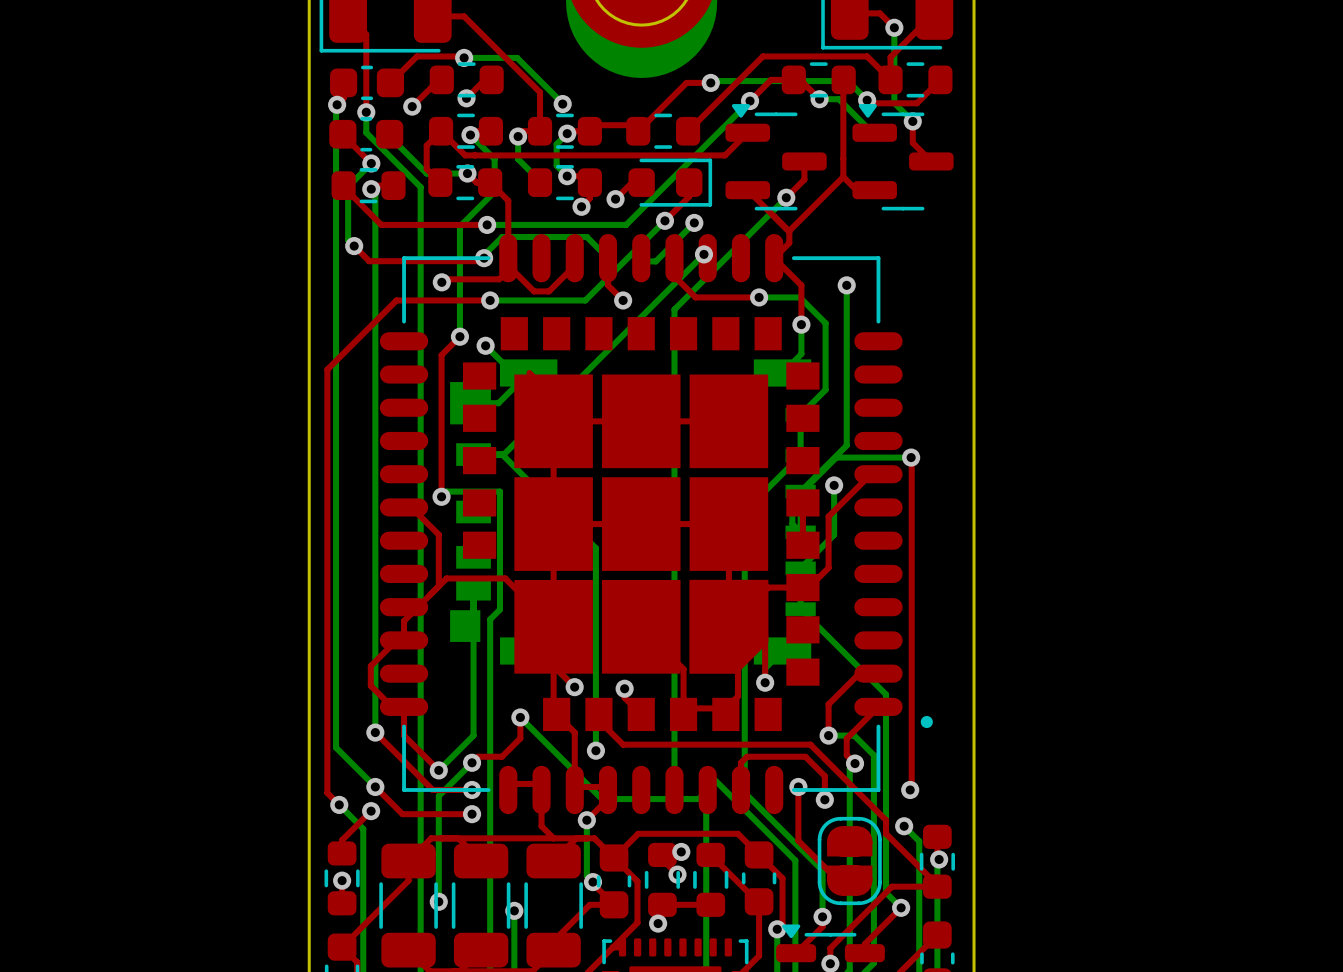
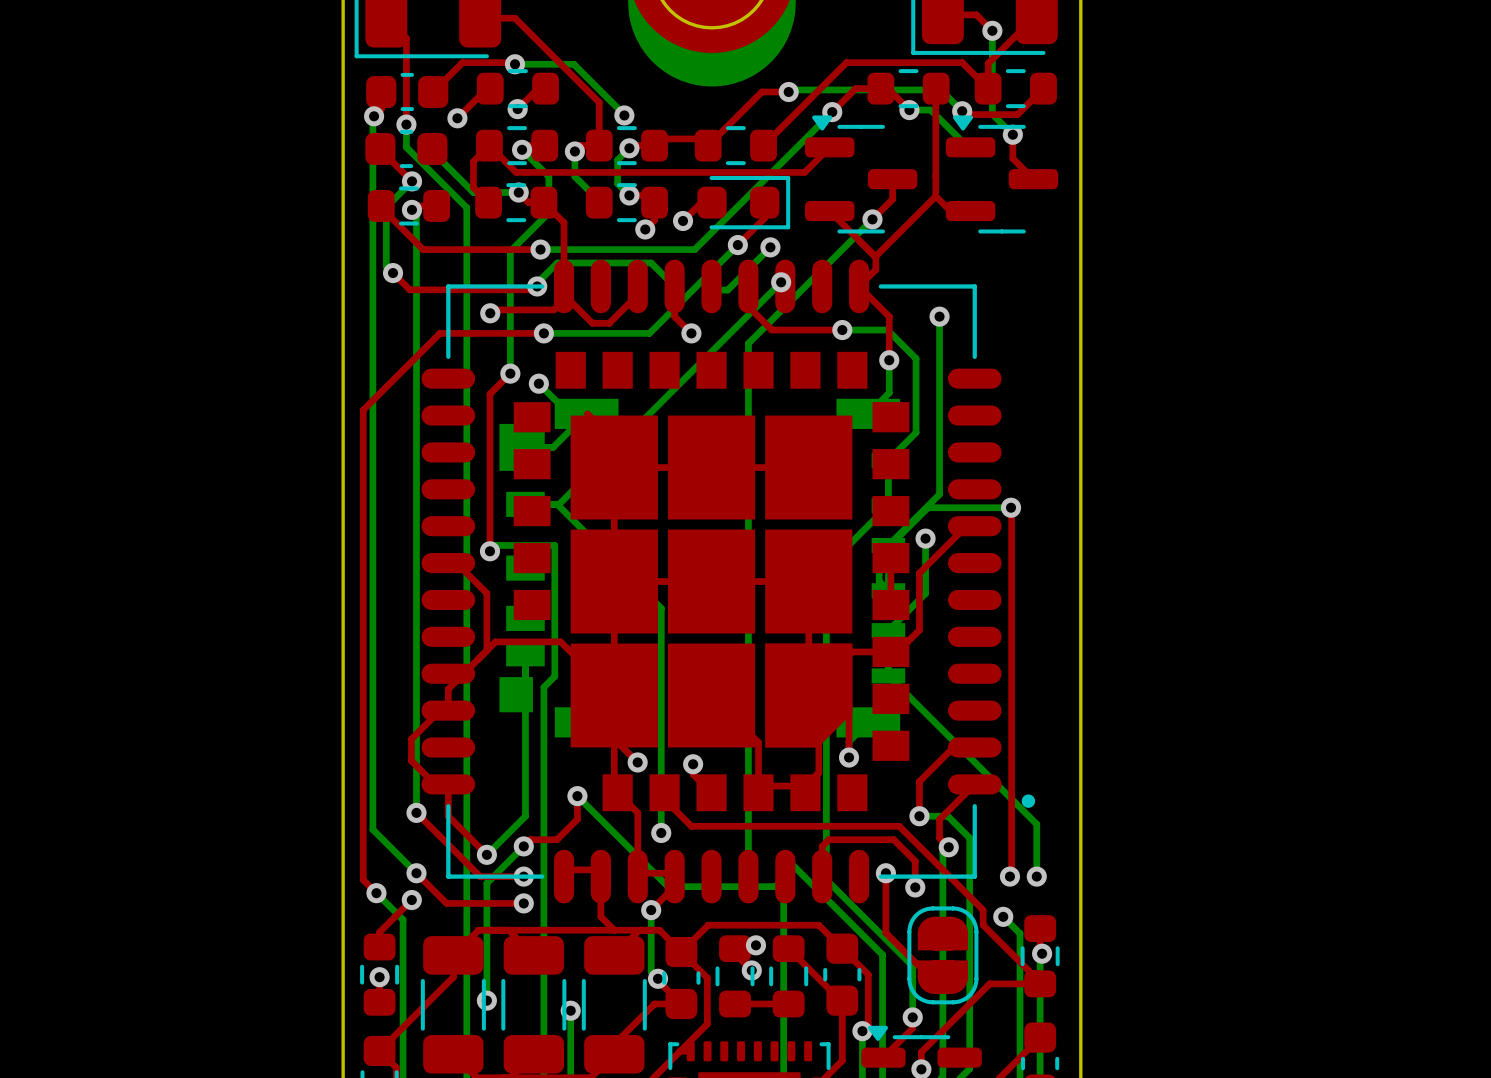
bottom track: (886, 694) (886, 892) (901, 907) -> (983, 770) (1036, 824) (1036, 876)
top track: (901, 907) (864, 944) (864, 953) -> none
via position: (901, 907) -> (1036, 876)
via: (658, 923) -> none

